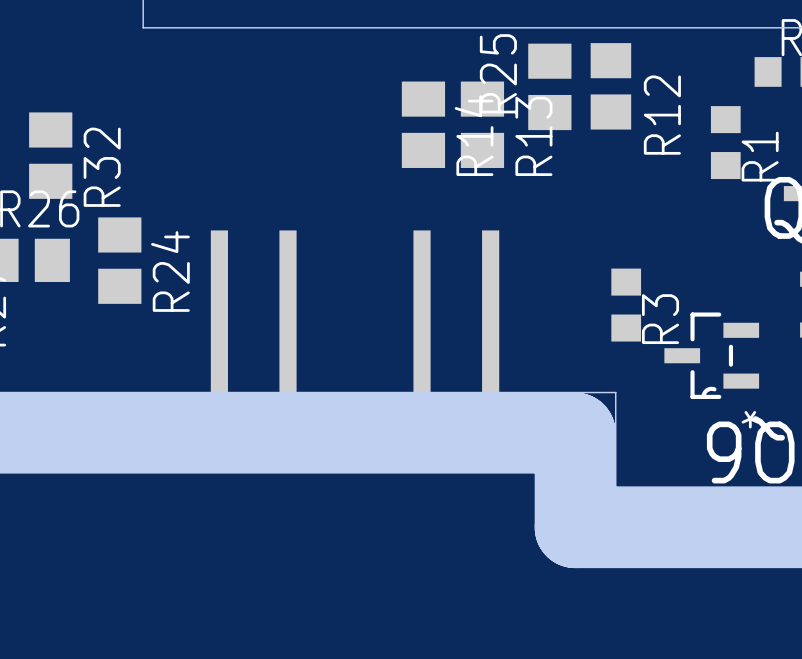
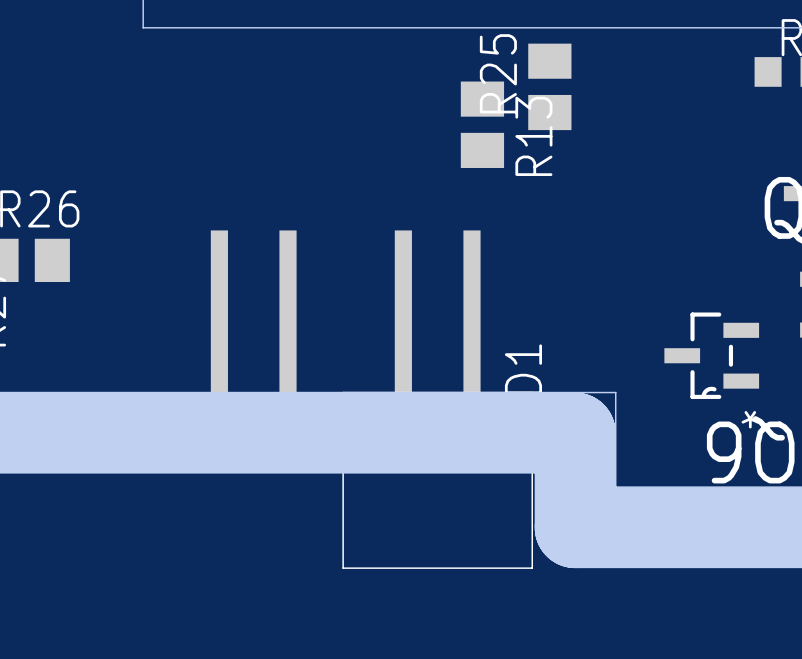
R12: (610, 86) -> none
part: (423, 124) -> none
R1: (725, 142) -> none
R32: (50, 155) -> none
R24: (119, 260) -> none
R3: (626, 305) -> none
D1 side: bottom (456, 311) -> top (437, 399)

